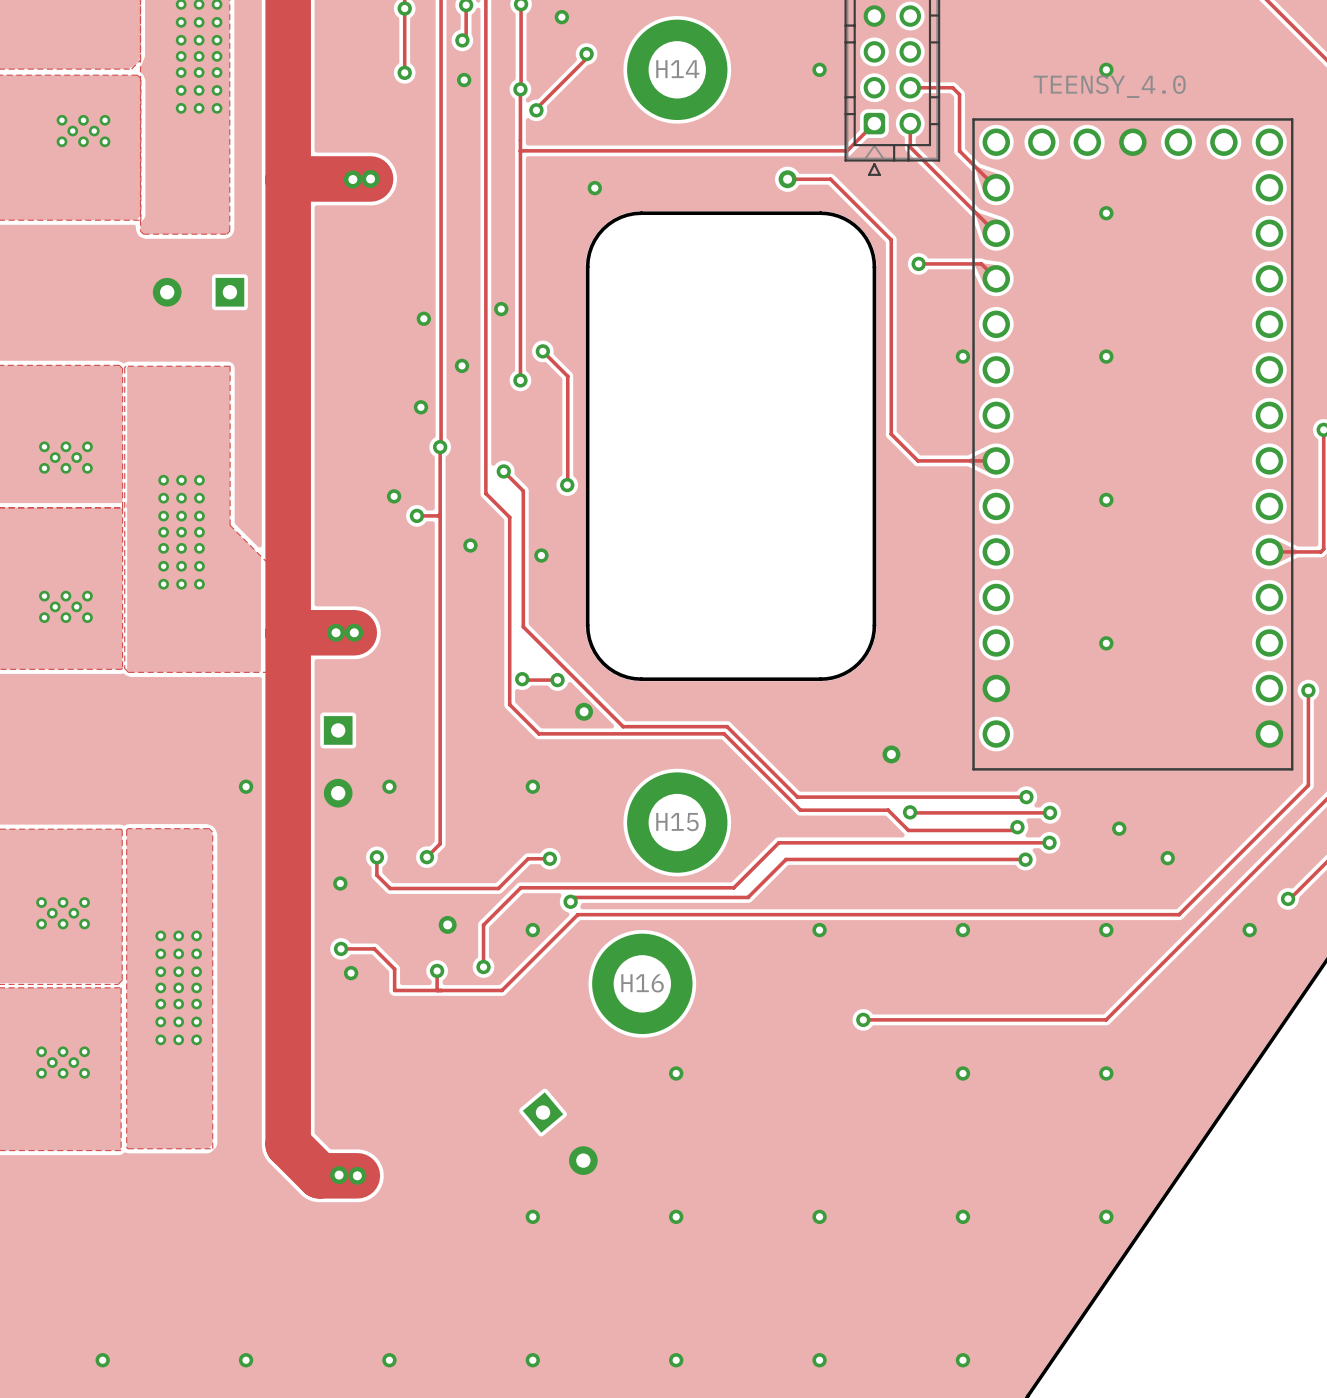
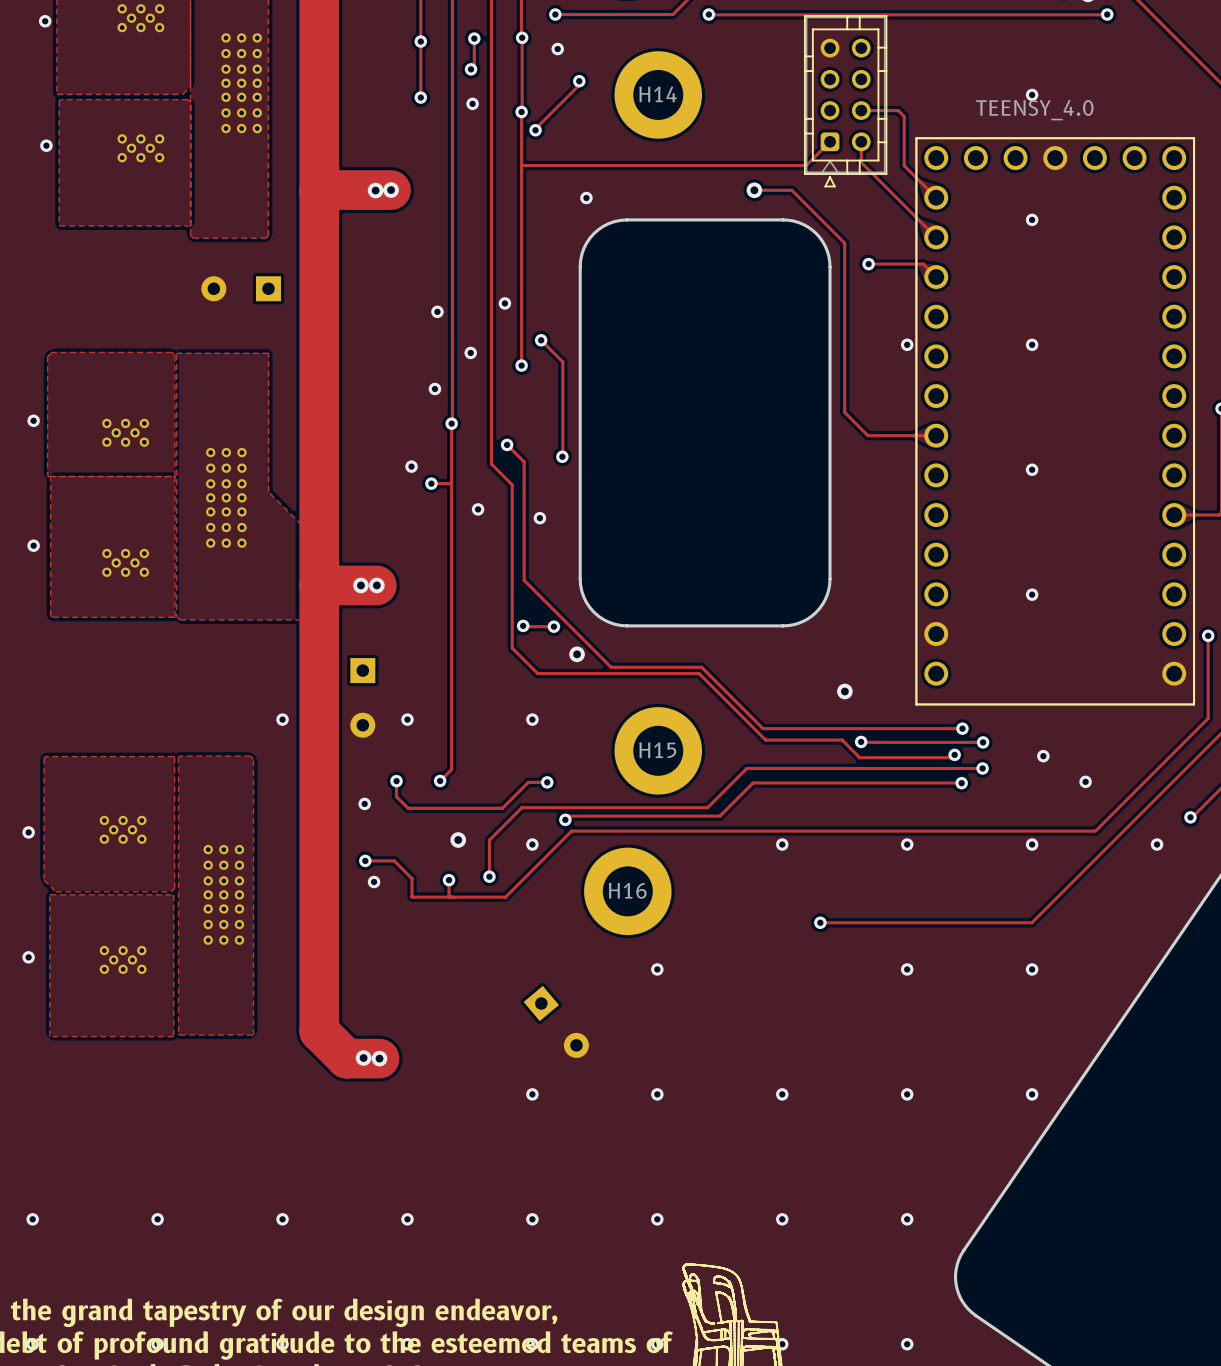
via: (819, 69) -> none

